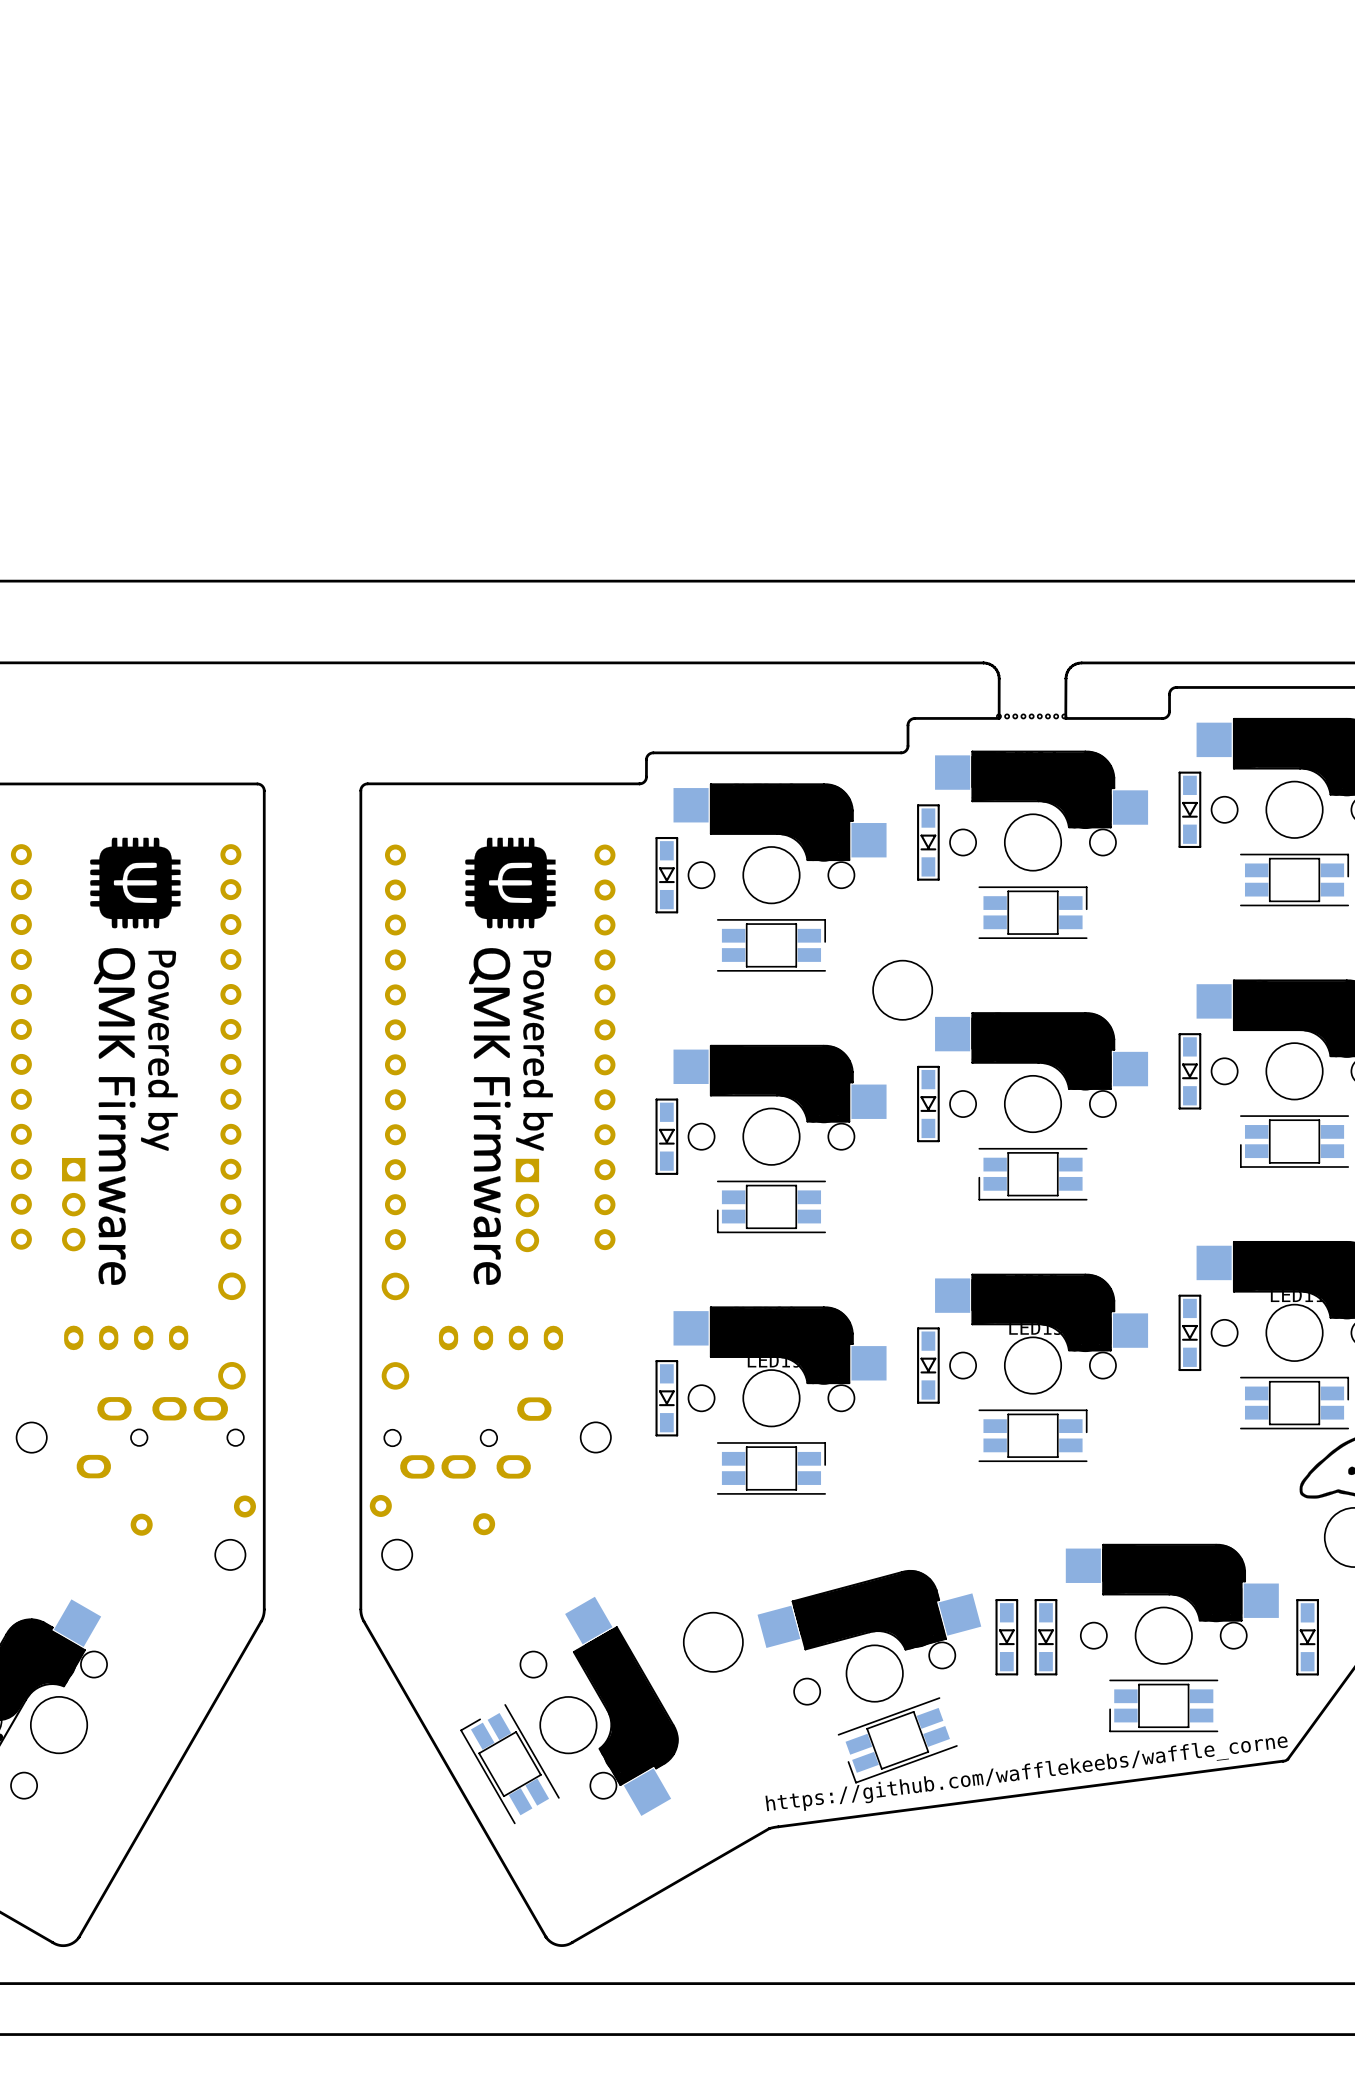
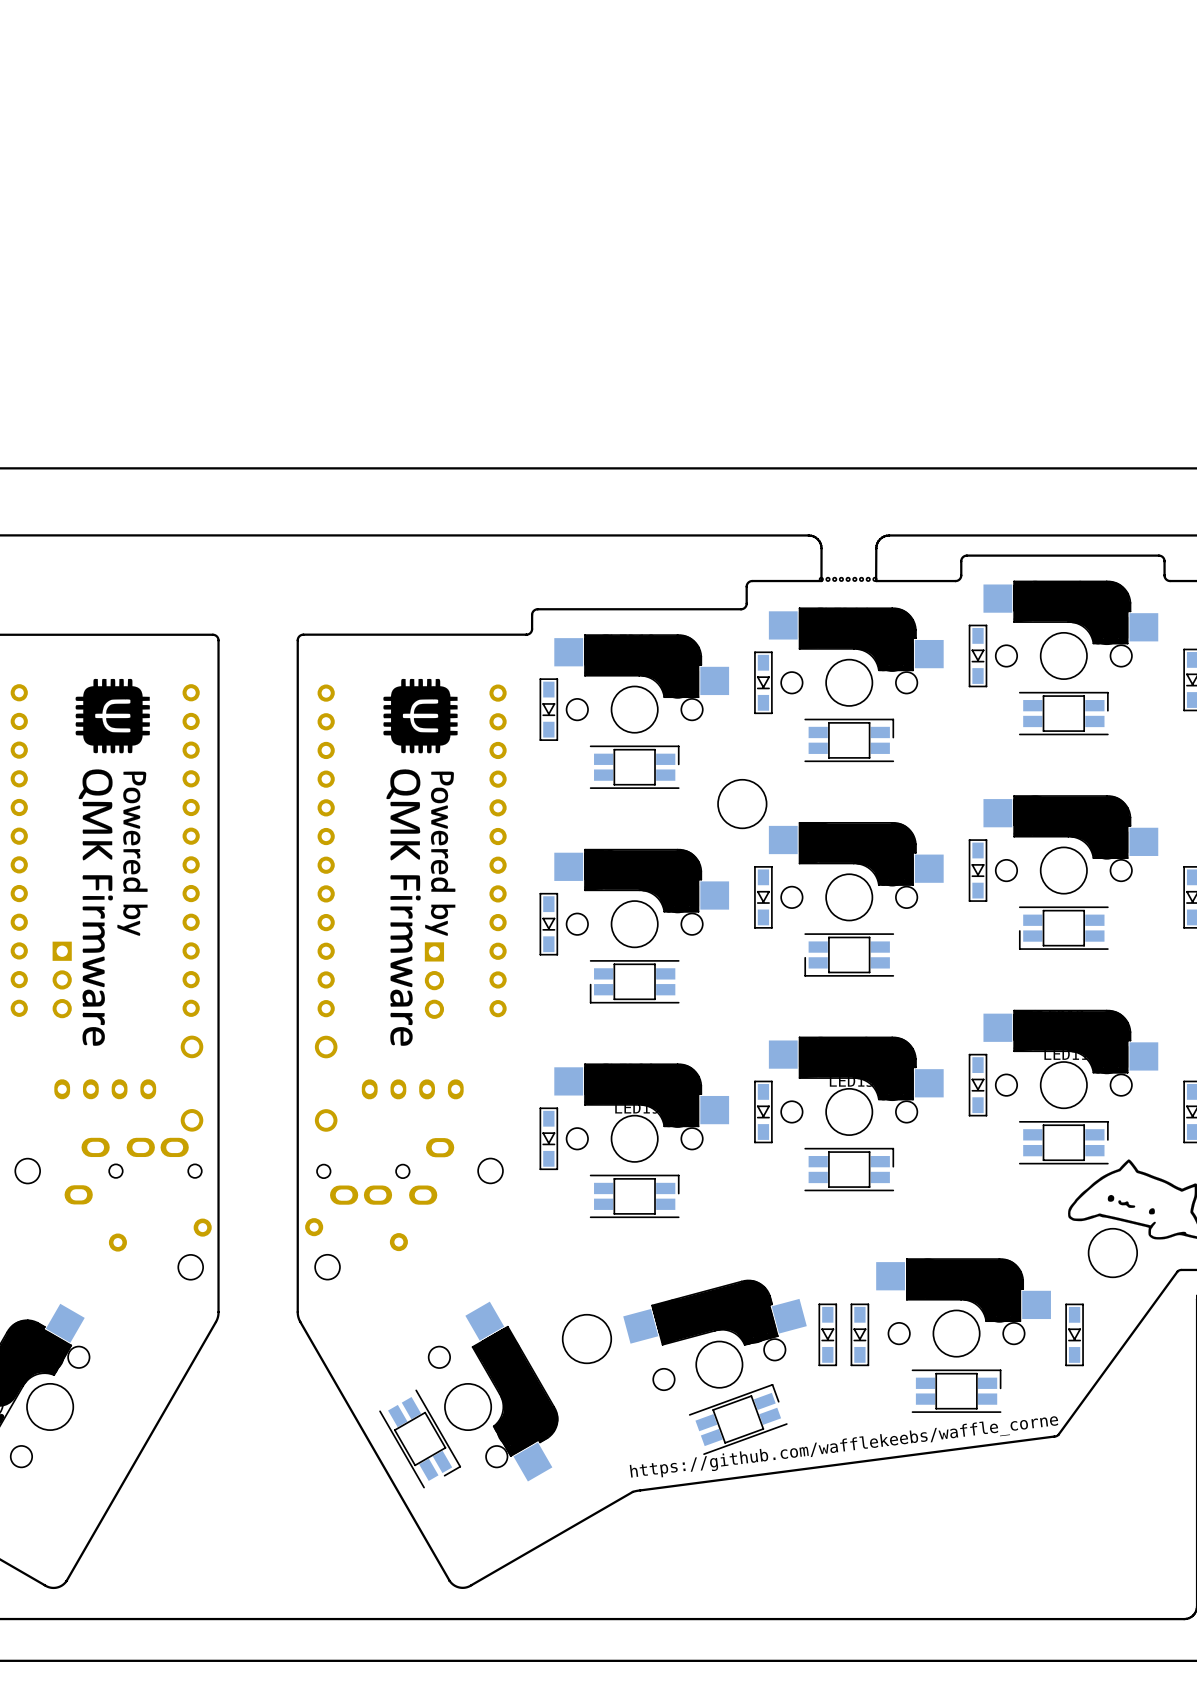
part rotation: 0° (1163, 1705) -> 180° (956, 1391)
part rotation: 0° (897, 1740) -> 180° (738, 1419)
part rotation: 0° (510, 1764) -> 180° (420, 1438)

